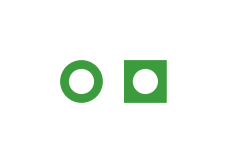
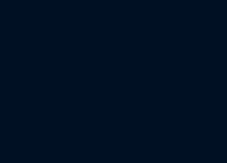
part: (113, 81) -> none

